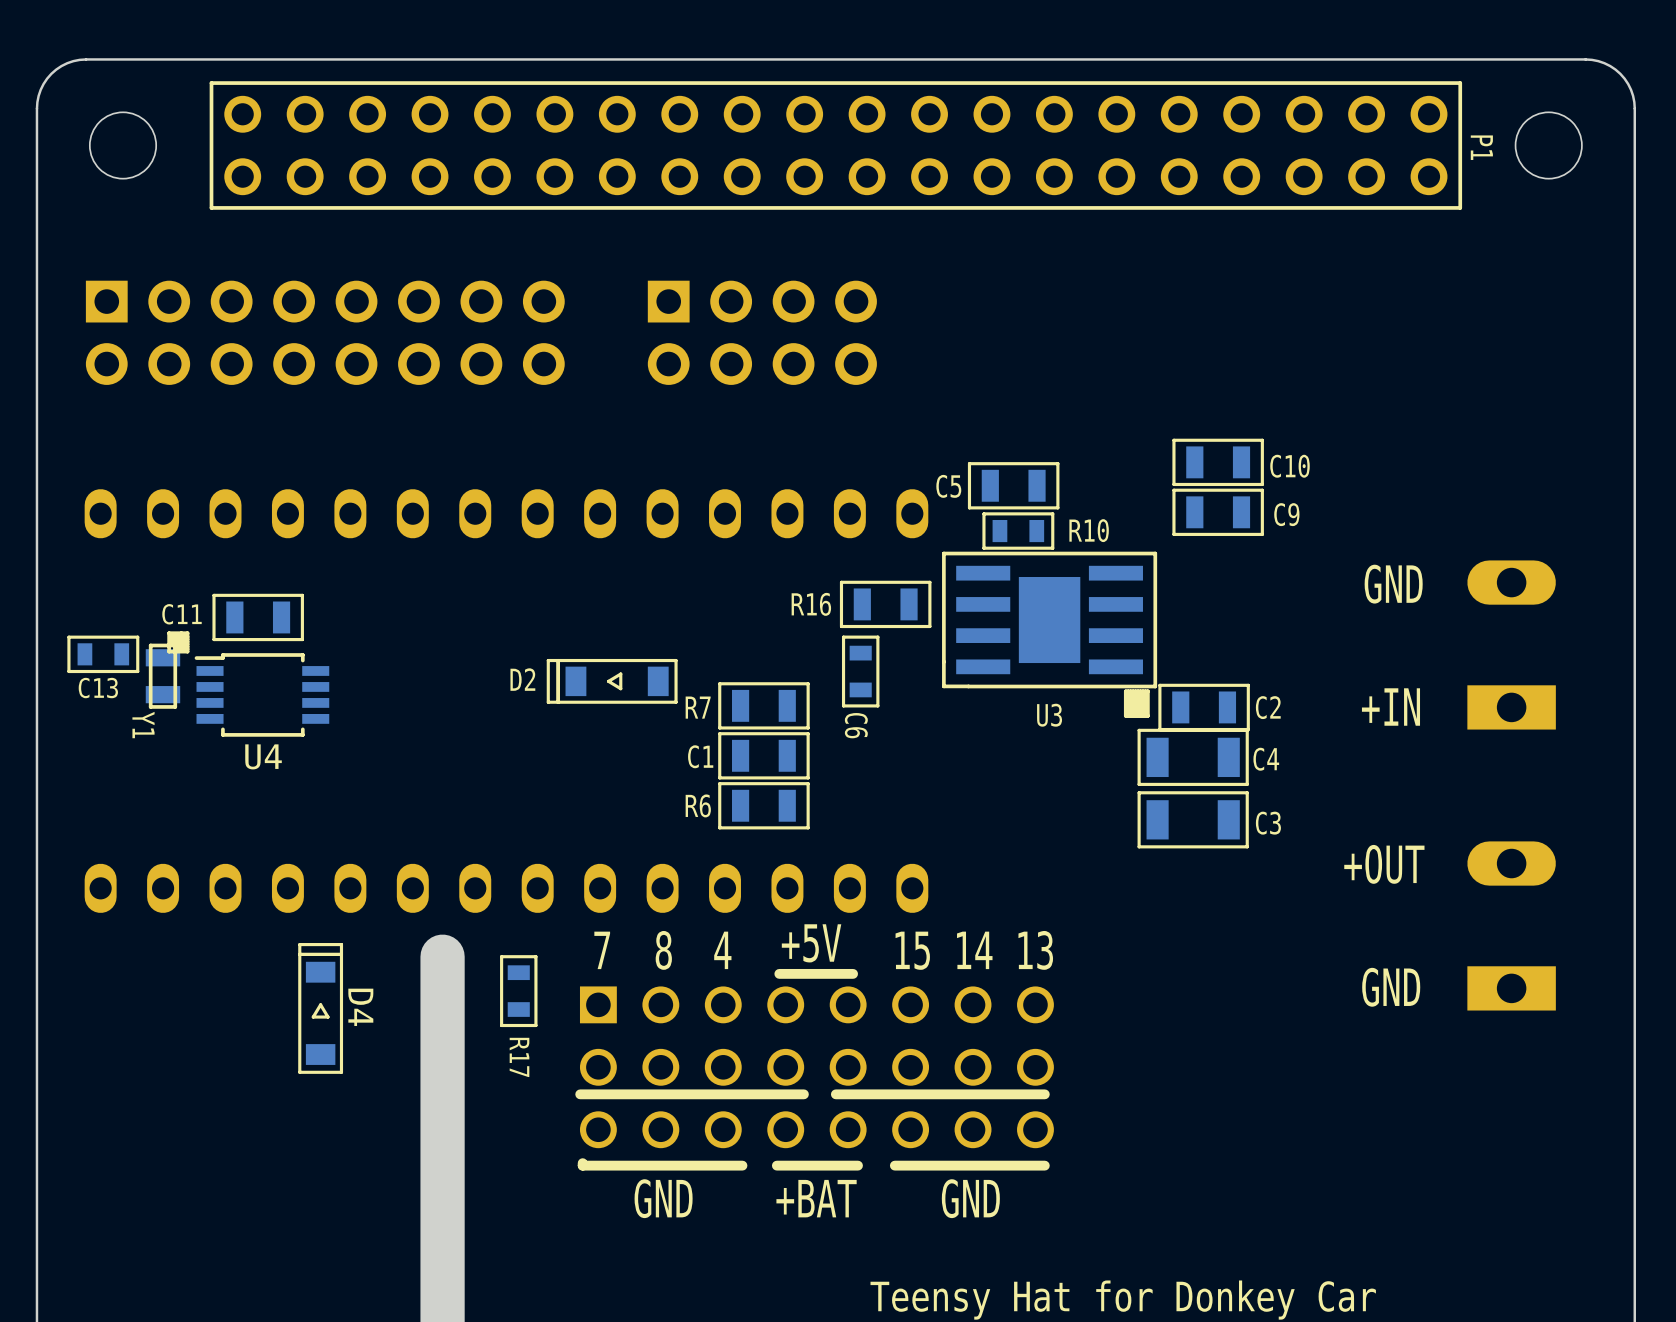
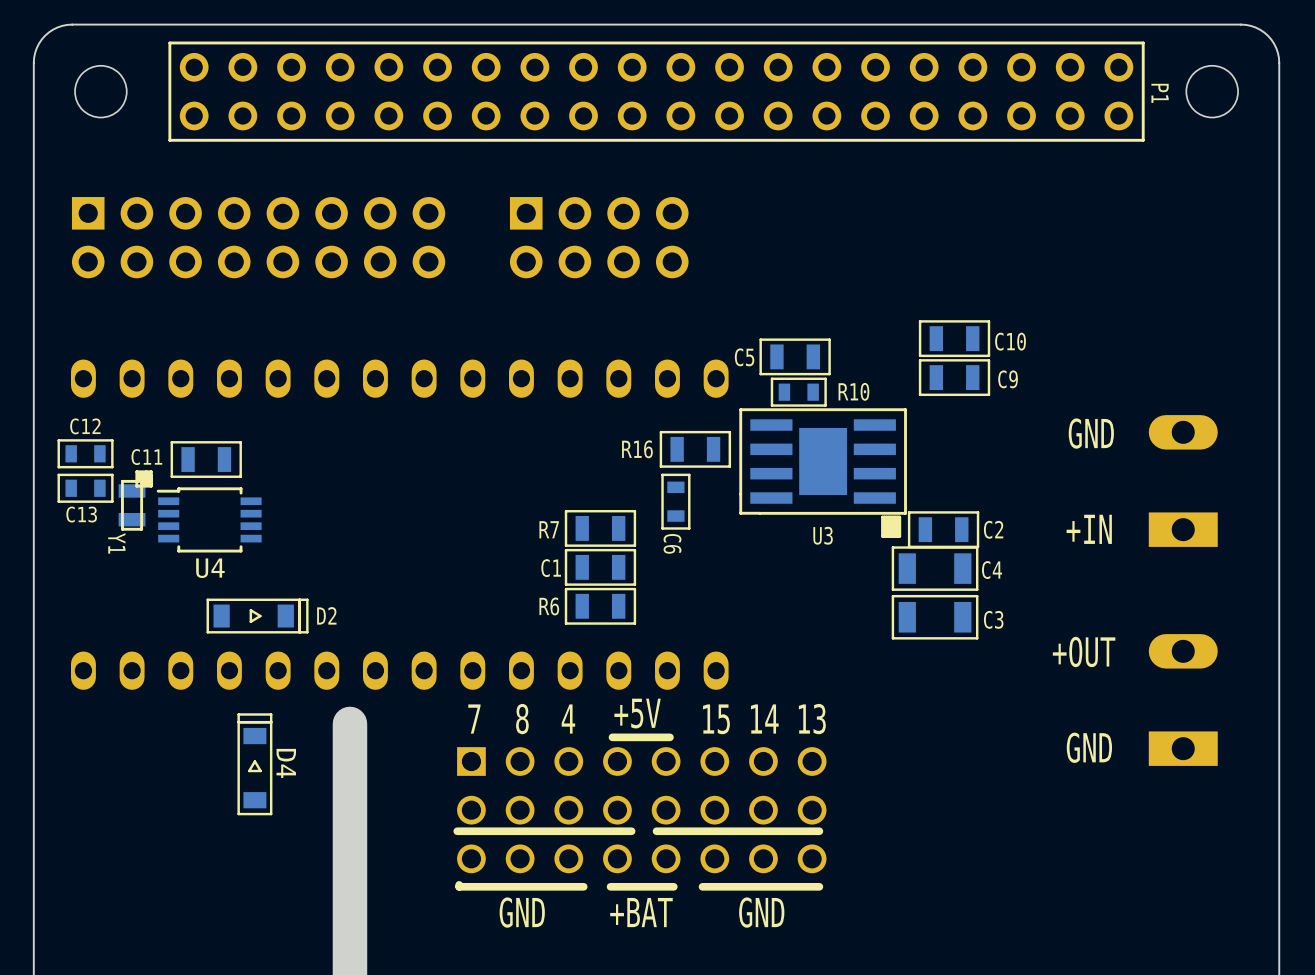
C12: none -> (85, 453)
D2 rotation: 0° (612, 681) -> 180° (257, 616)
D2 position: (612, 681) -> (257, 616)
R17: (518, 991) -> none

